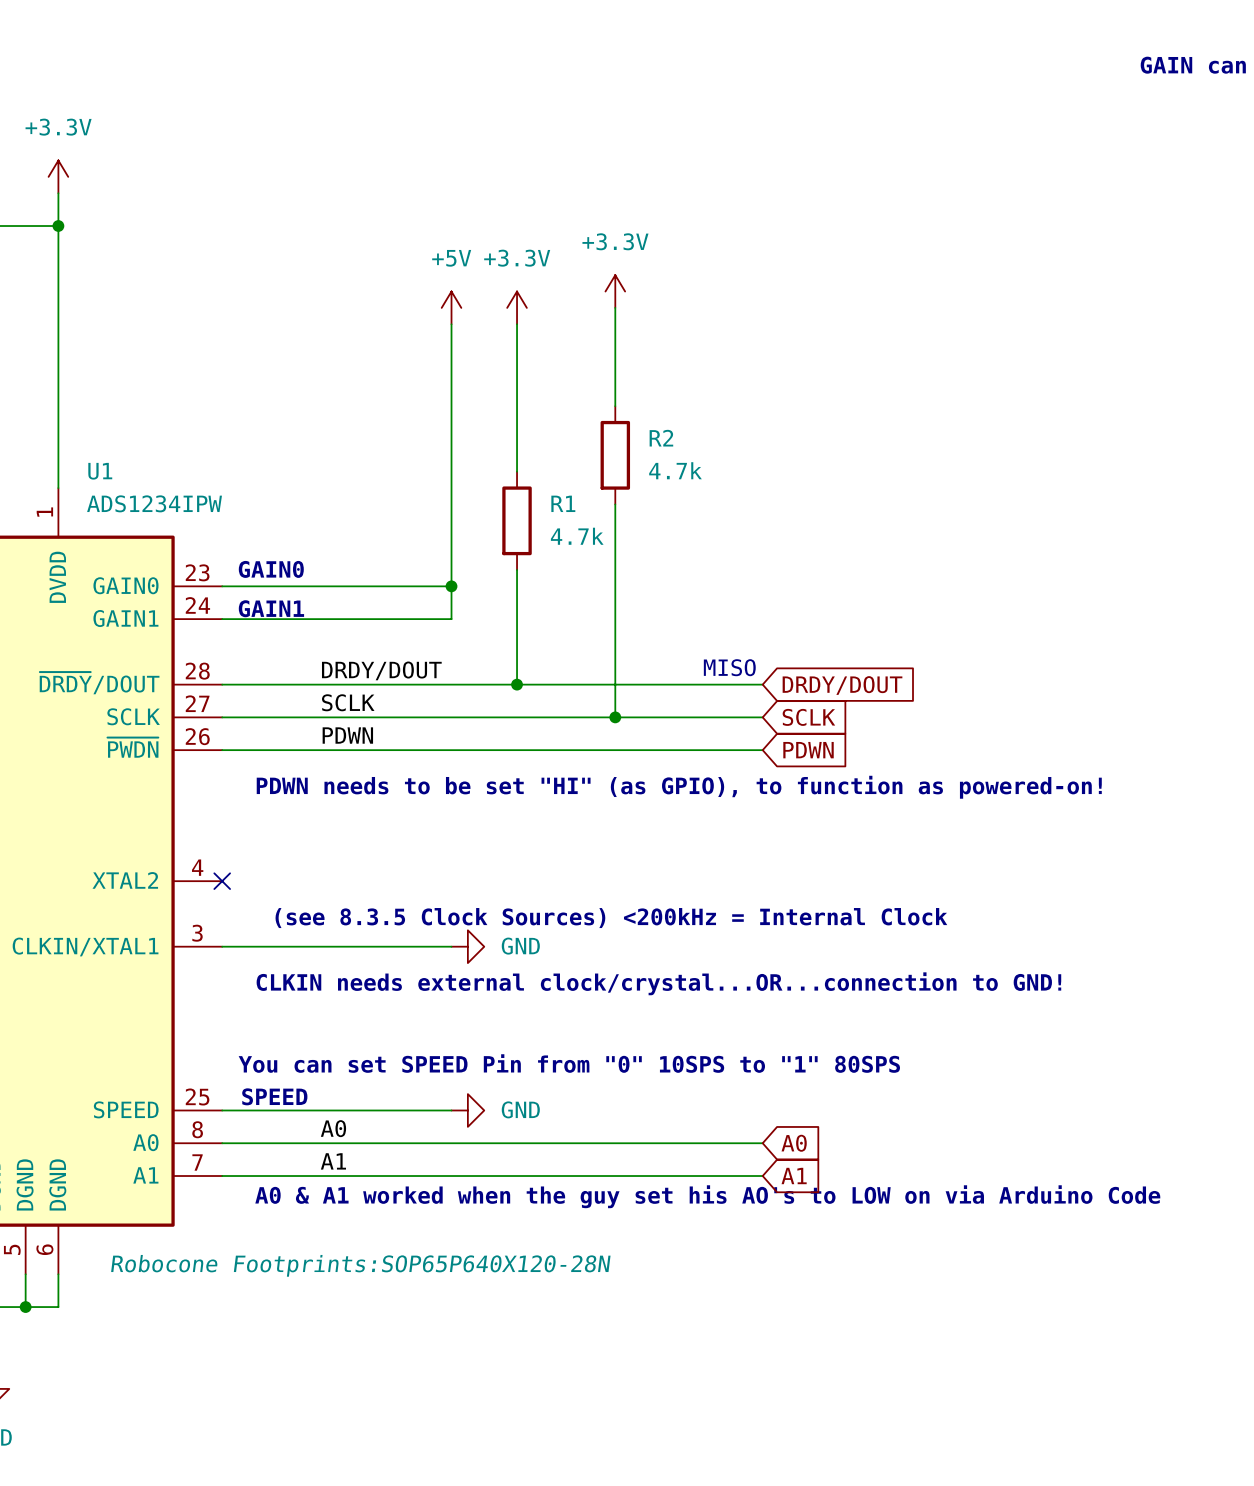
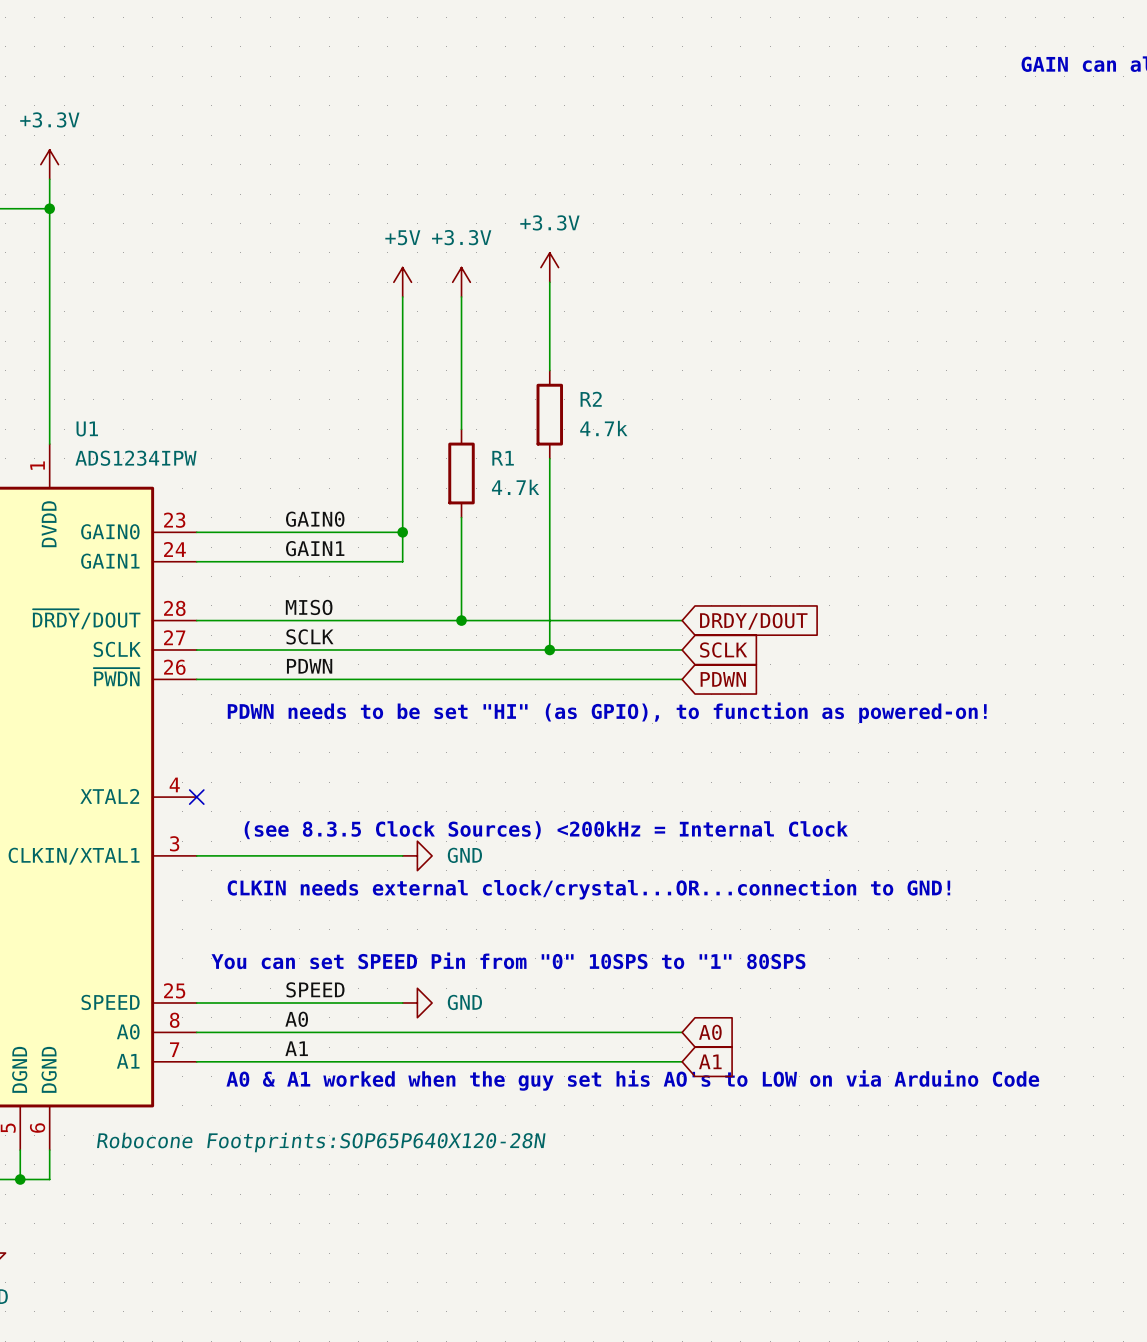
text: GAIN0 (271, 569) -> none
label: none -> GAIN0 (315, 519)
label: none -> GAIN1 (315, 548)
text: GAIN1 (271, 608) -> none
text: MISO (729, 667) -> none
label: DRDY/DOUT (381, 670) -> MISO (309, 607)
label: none -> SPEED (315, 989)
text: SPEED (274, 1096) -> none

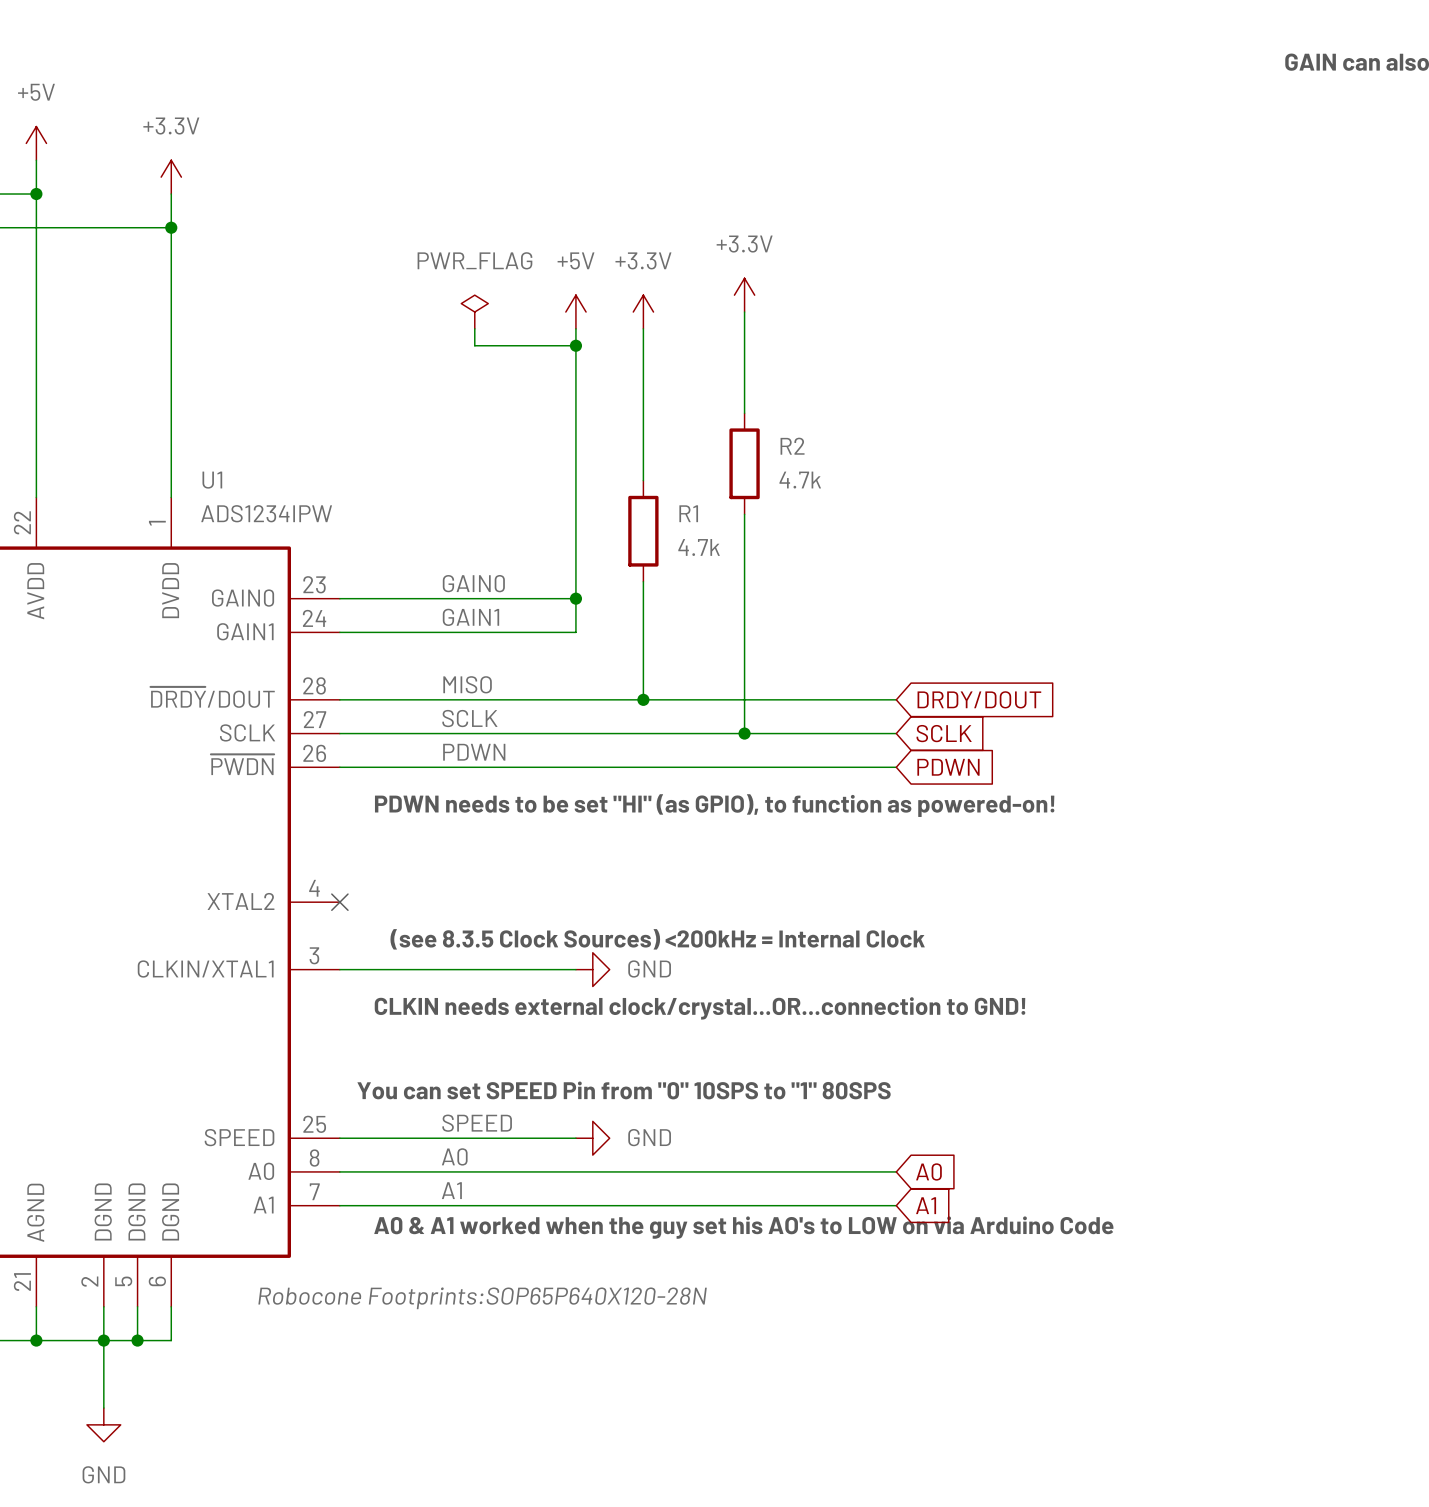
power symbol: none -> PWR_FLAG (474, 312)
wire: none -> (474, 328) (474, 345) (575, 345)
junction: none -> (575, 345)

